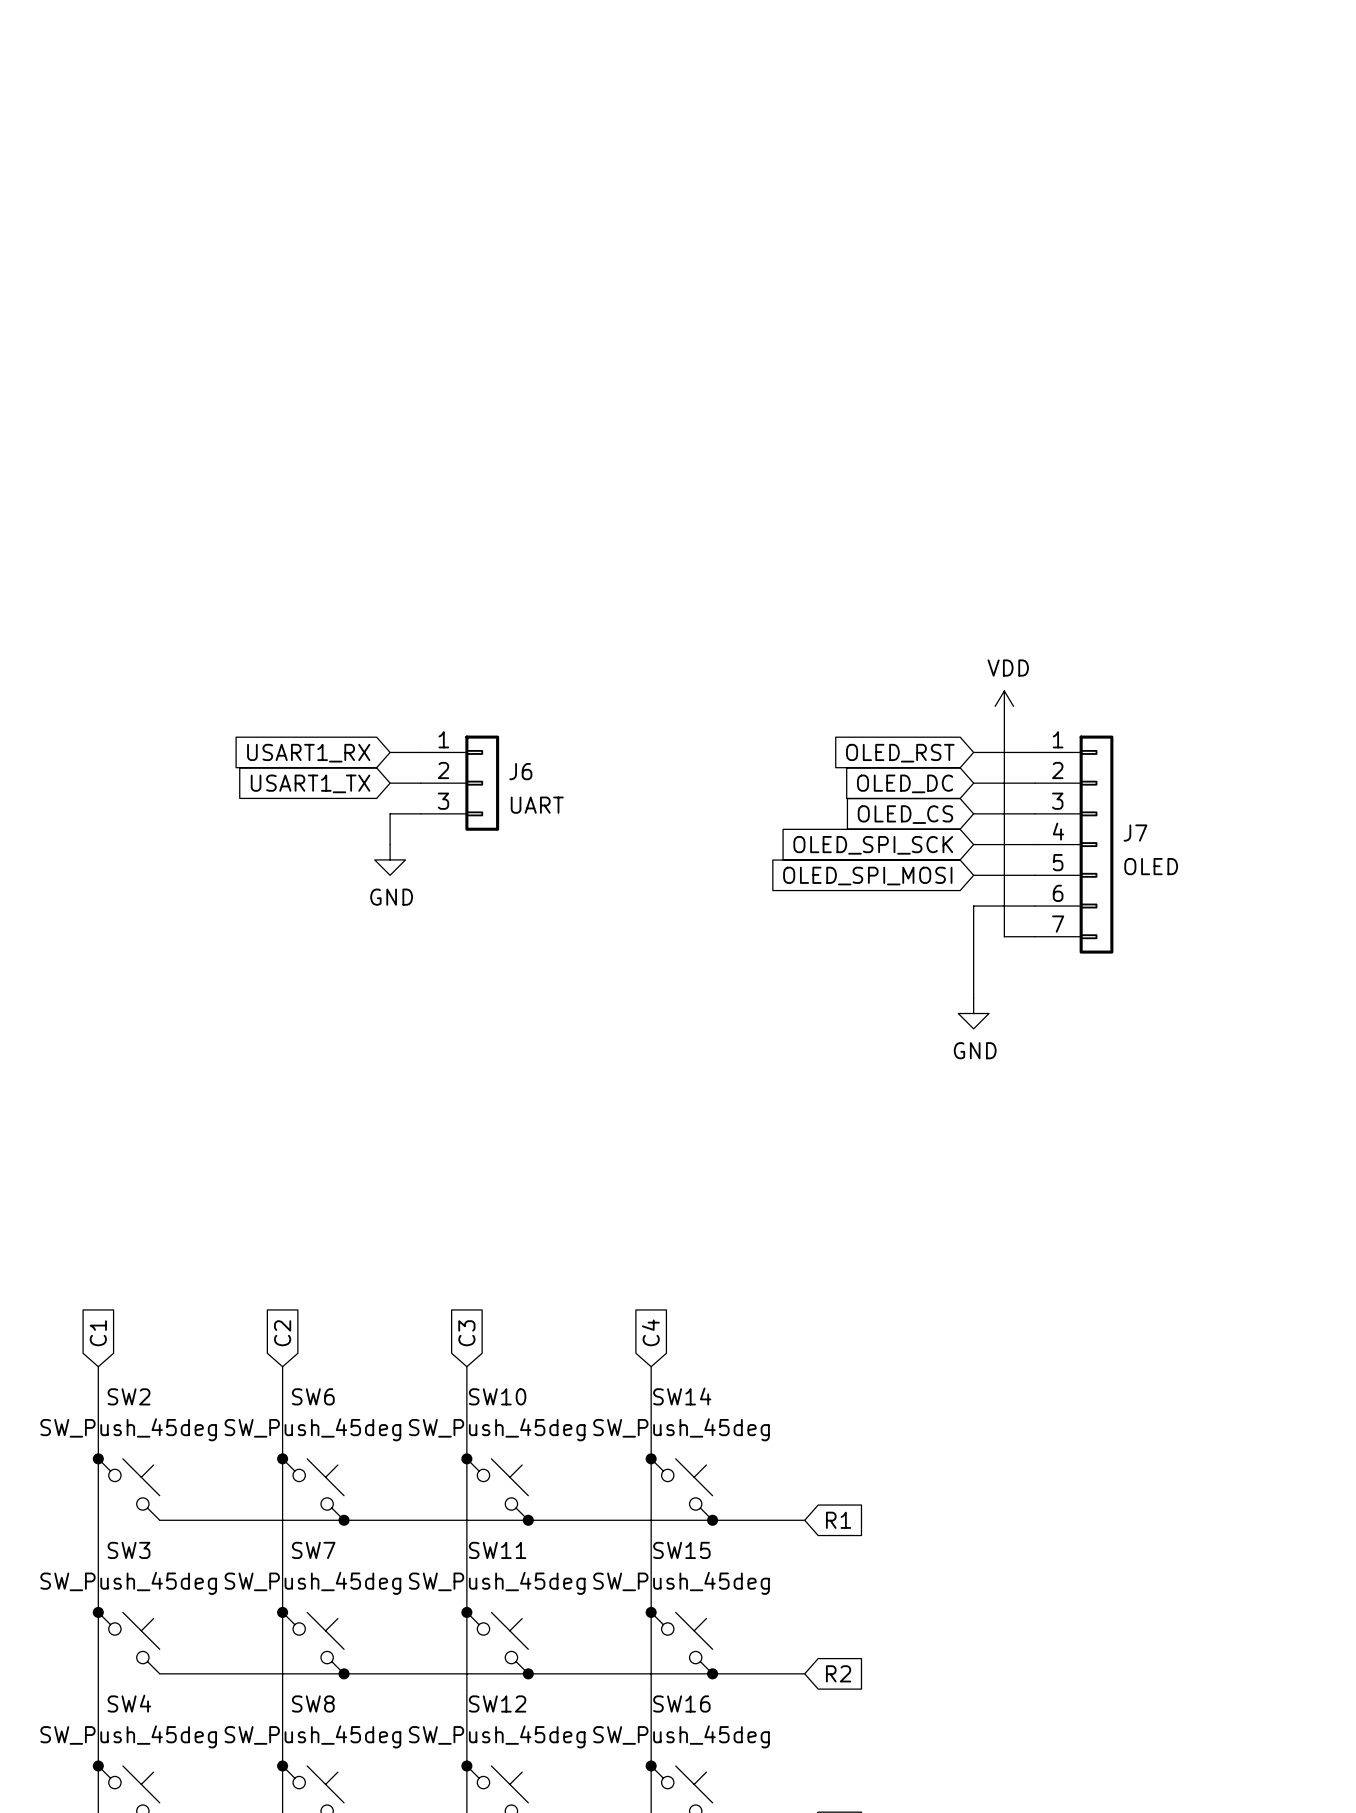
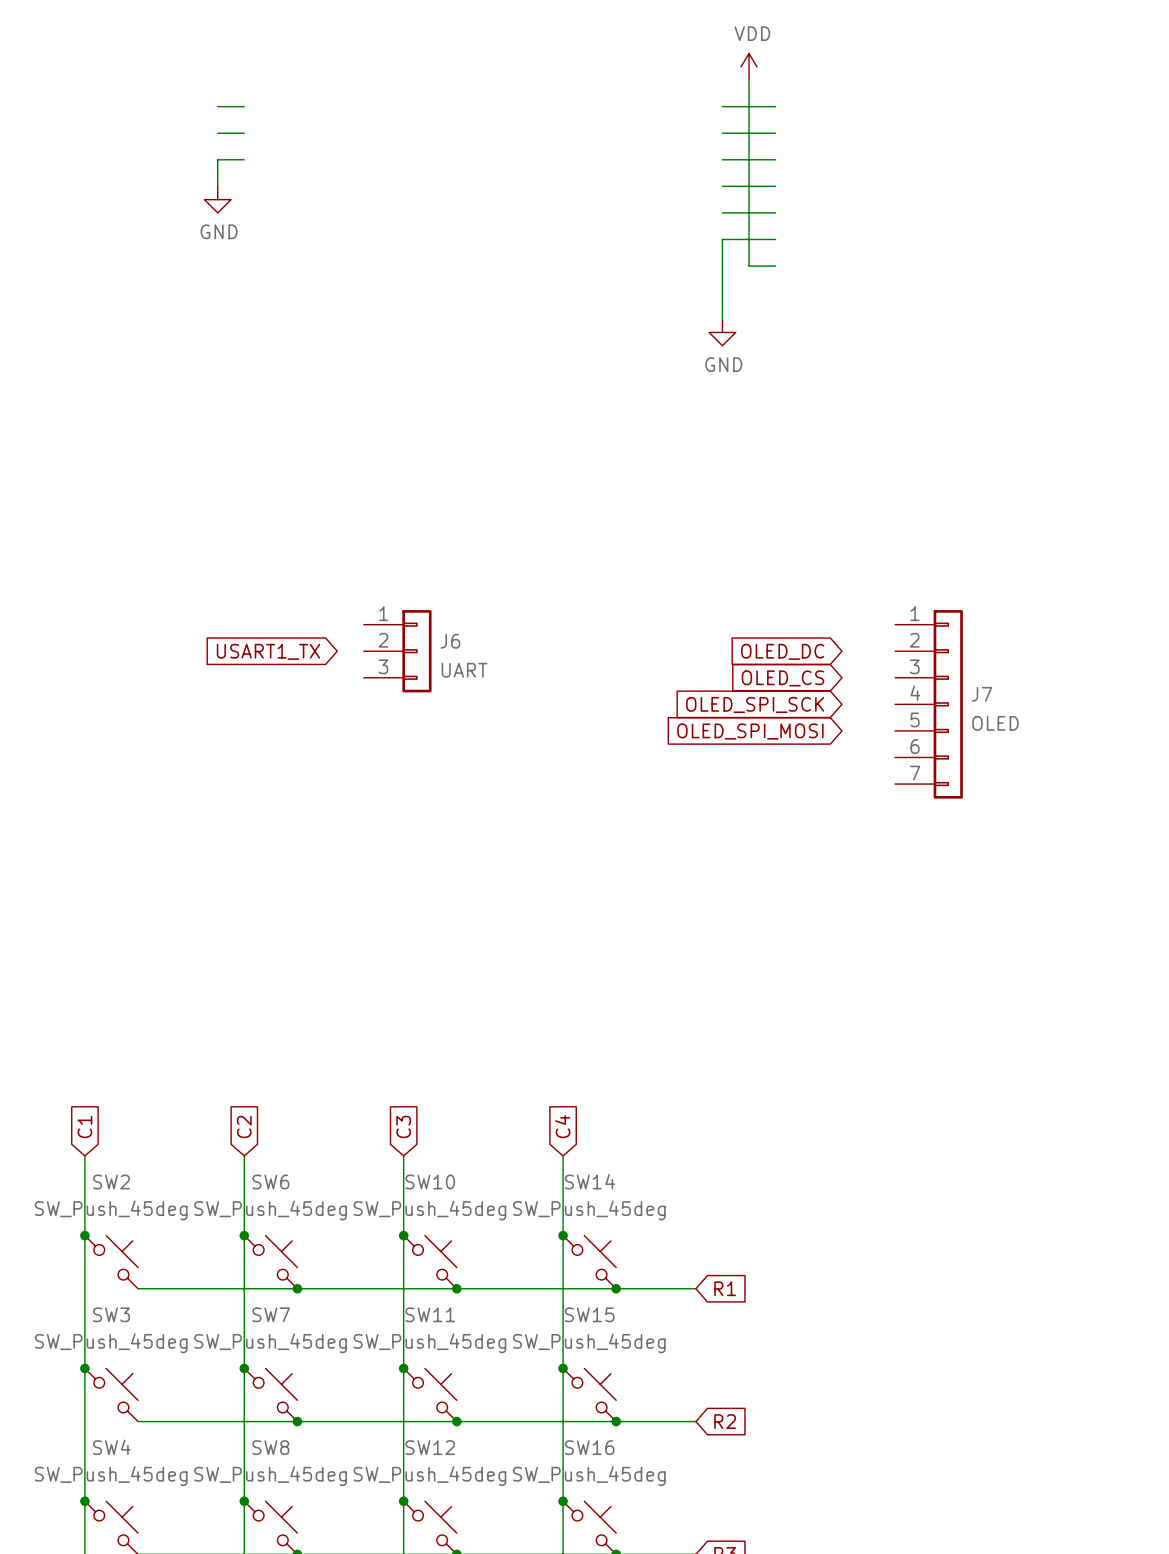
power symbol: none -> VDD (749, 66)
wire: none -> (749, 80) (749, 266) (775, 266)
wire: none -> (217, 106) (244, 106)
wire: none -> (722, 106) (775, 106)
wire: none -> (217, 133) (244, 133)
wire: none -> (722, 133) (775, 133)
wire: none -> (244, 159) (217, 159) (217, 186)
wire: none -> (722, 159) (775, 159)
wire: none -> (722, 186) (775, 186)
power symbol: none -> GND (217, 199)
wire: none -> (722, 212) (775, 212)
wire: none -> (775, 239) (722, 239) (722, 319)
power symbol: none -> GND (722, 332)
power symbol: VDD (1004, 706) -> none
wire: (1004, 721) (1004, 936) (1035, 936) -> none
wire: (390, 752) (420, 752) -> none
wire: (973, 752) (1035, 752) -> none
global label: USART1_RX (308, 753) -> none
global label: OLED_RST (900, 753) -> none
wire: (390, 783) (420, 783) -> none
wire: (973, 783) (1035, 783) -> none
wire: (420, 813) (390, 813) (390, 844) -> none
wire: (973, 813) (1035, 813) -> none
wire: (973, 844) (1035, 844) -> none
power symbol: GND (390, 859) -> none
wire: (973, 875) (1035, 875) -> none
wire: (1035, 906) (973, 906) (973, 998) -> none
power symbol: GND (973, 1013) -> none

